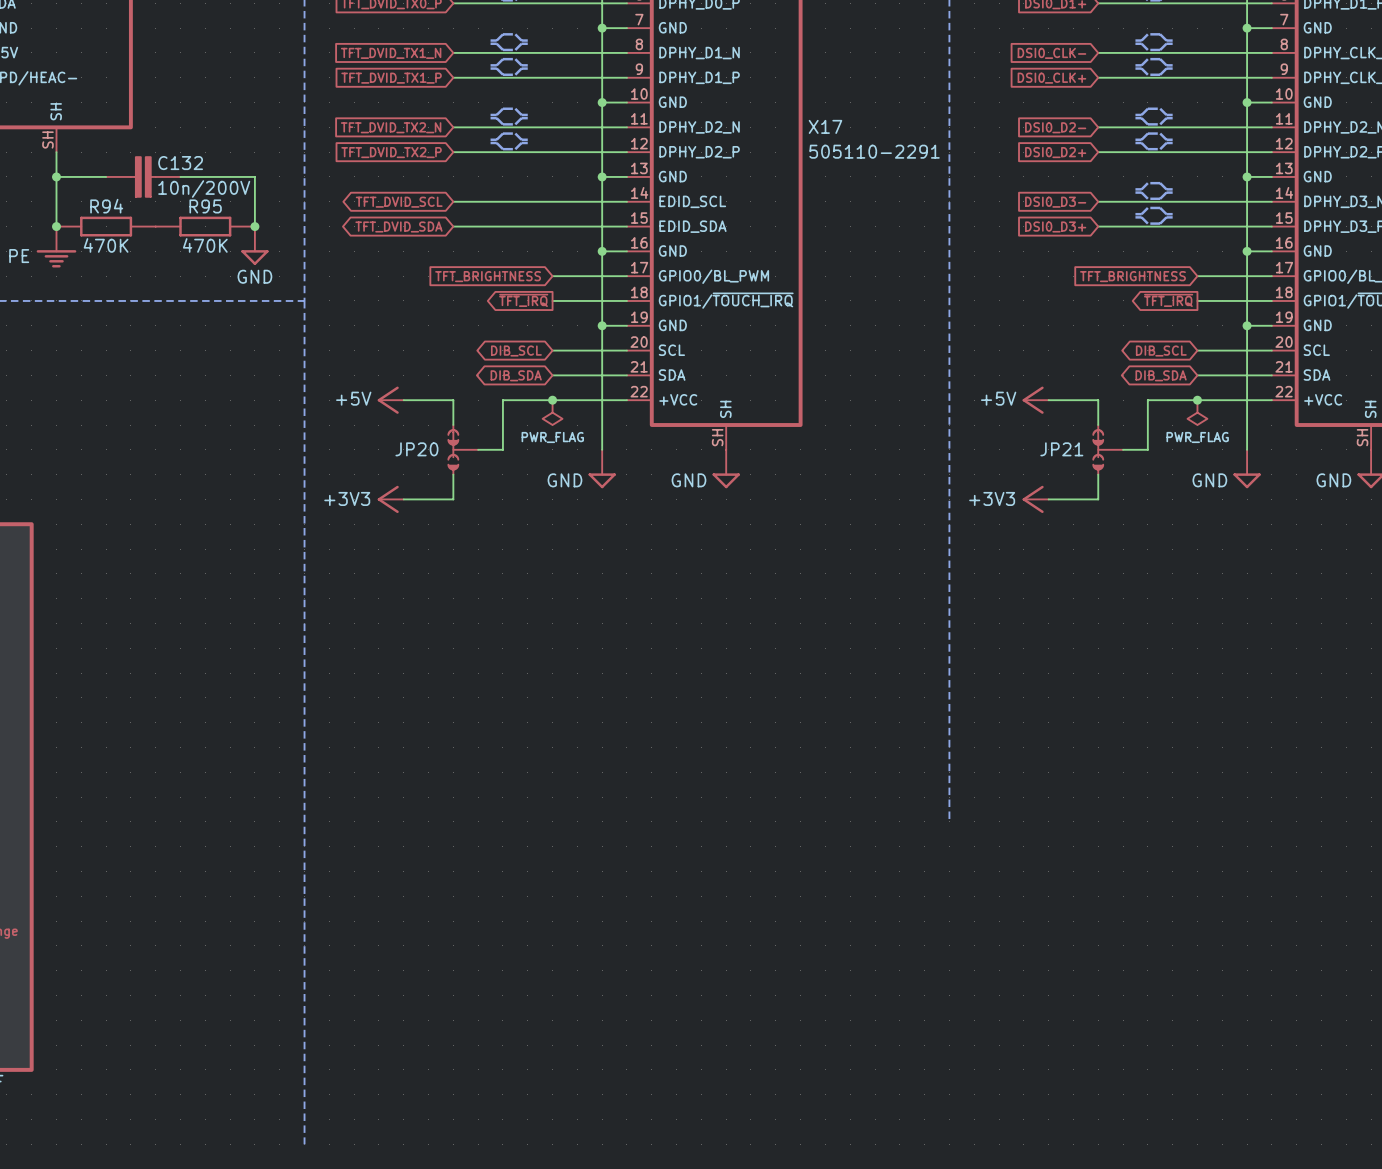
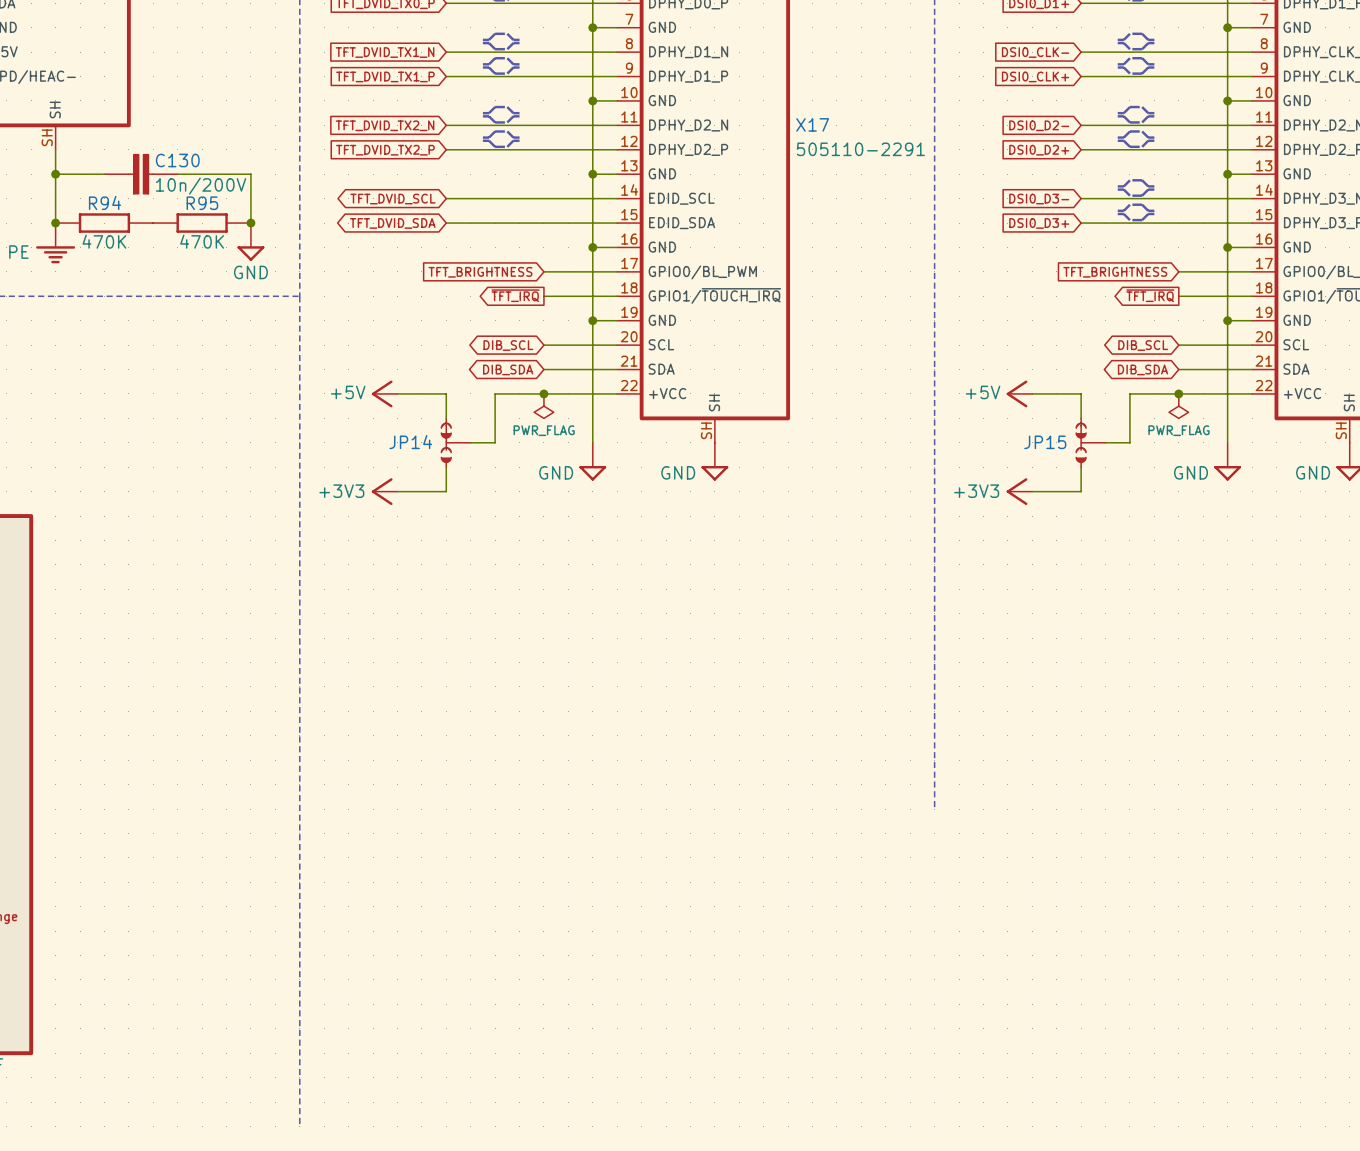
C132 name: C132 (180, 163) -> C130 (177, 160)
JP20 name: JP20 (416, 449) -> JP14 (410, 442)
JP21 name: JP21 (1061, 449) -> JP15 (1045, 442)

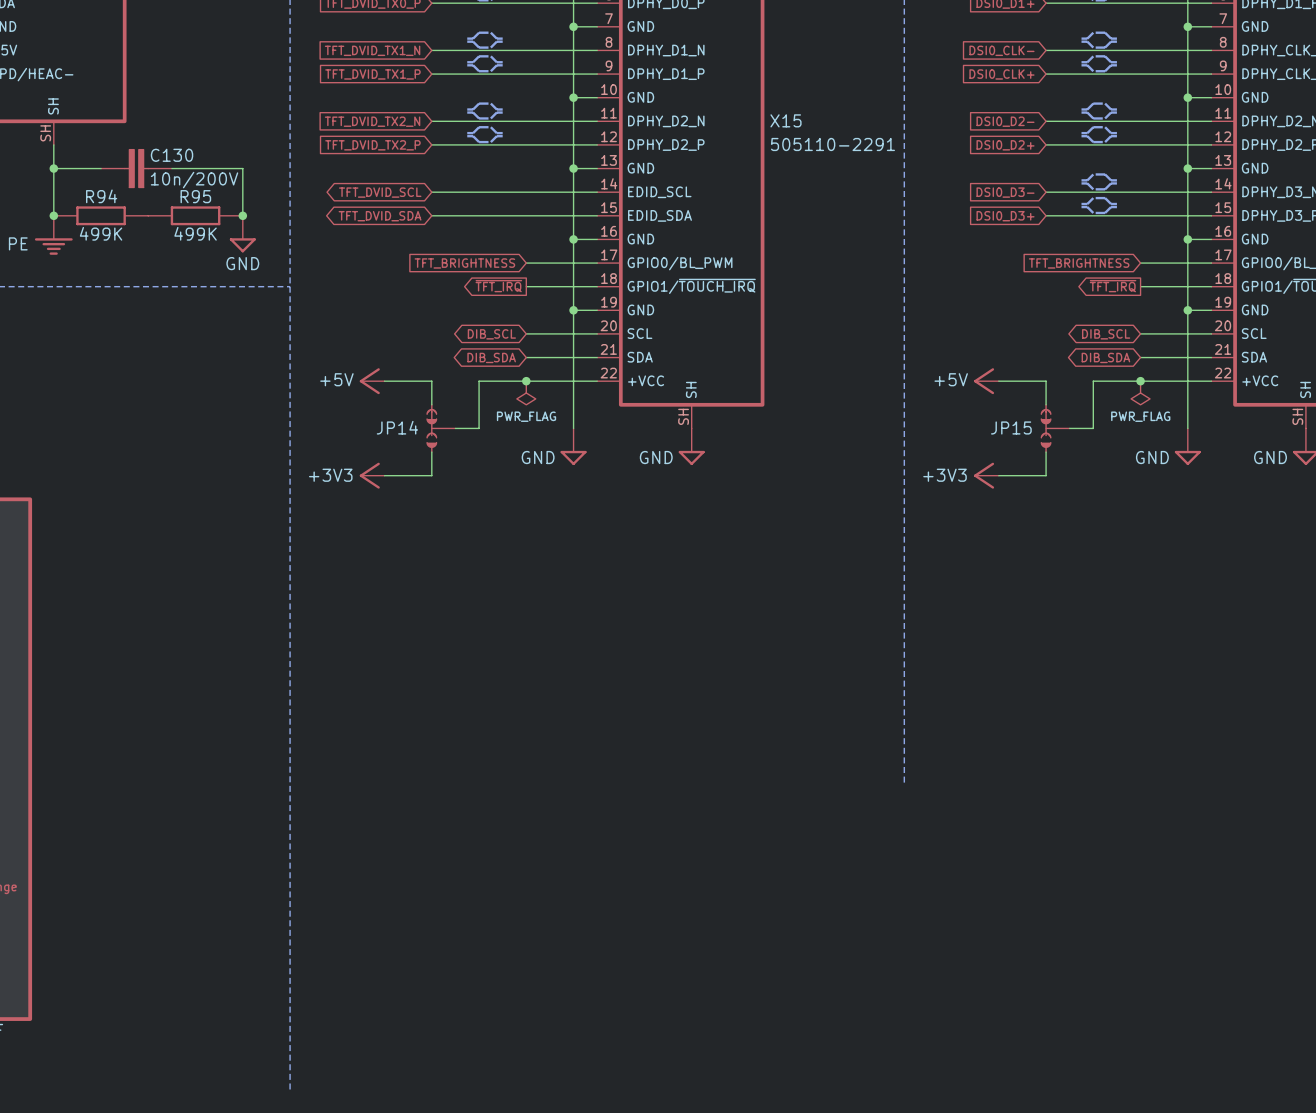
X17 name: X17 (812, 124) -> X15 (785, 120)
R94 value: 470K (104, 241) -> 499K (101, 233)
R95 value: 470K (202, 241) -> 499K (195, 233)

